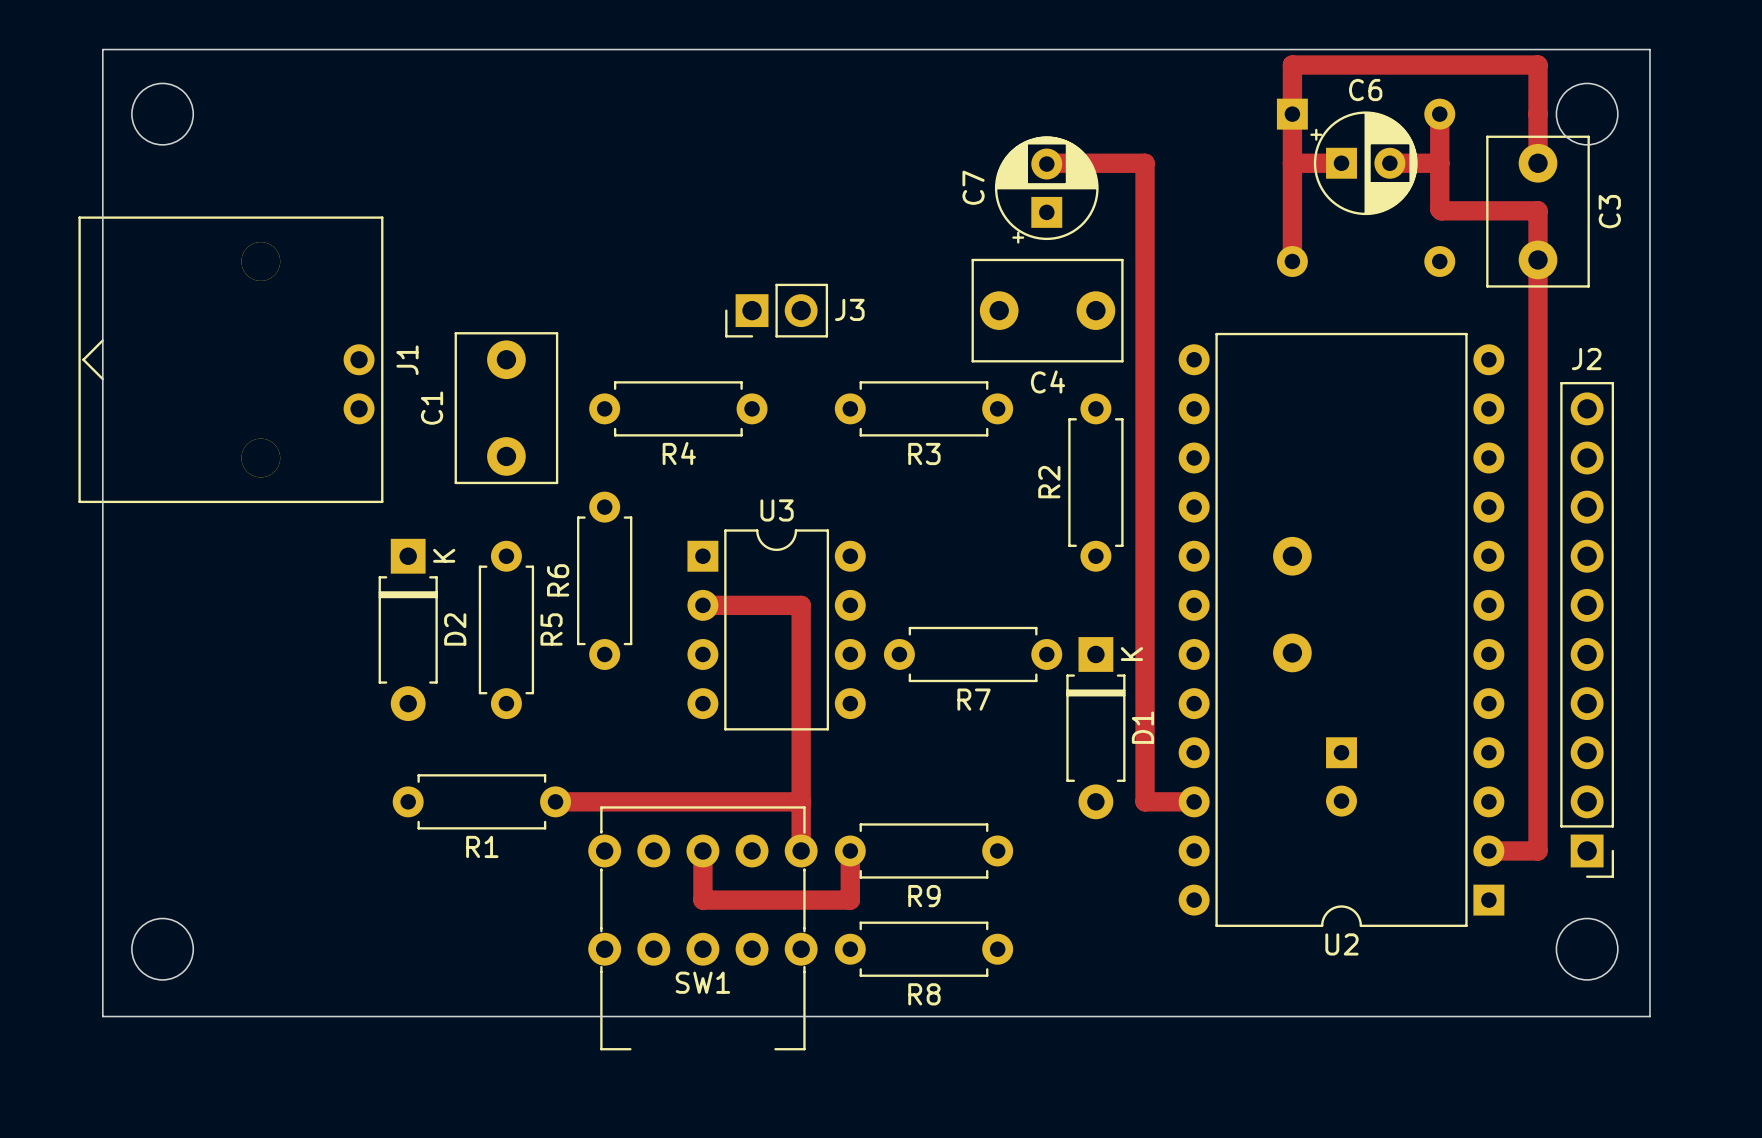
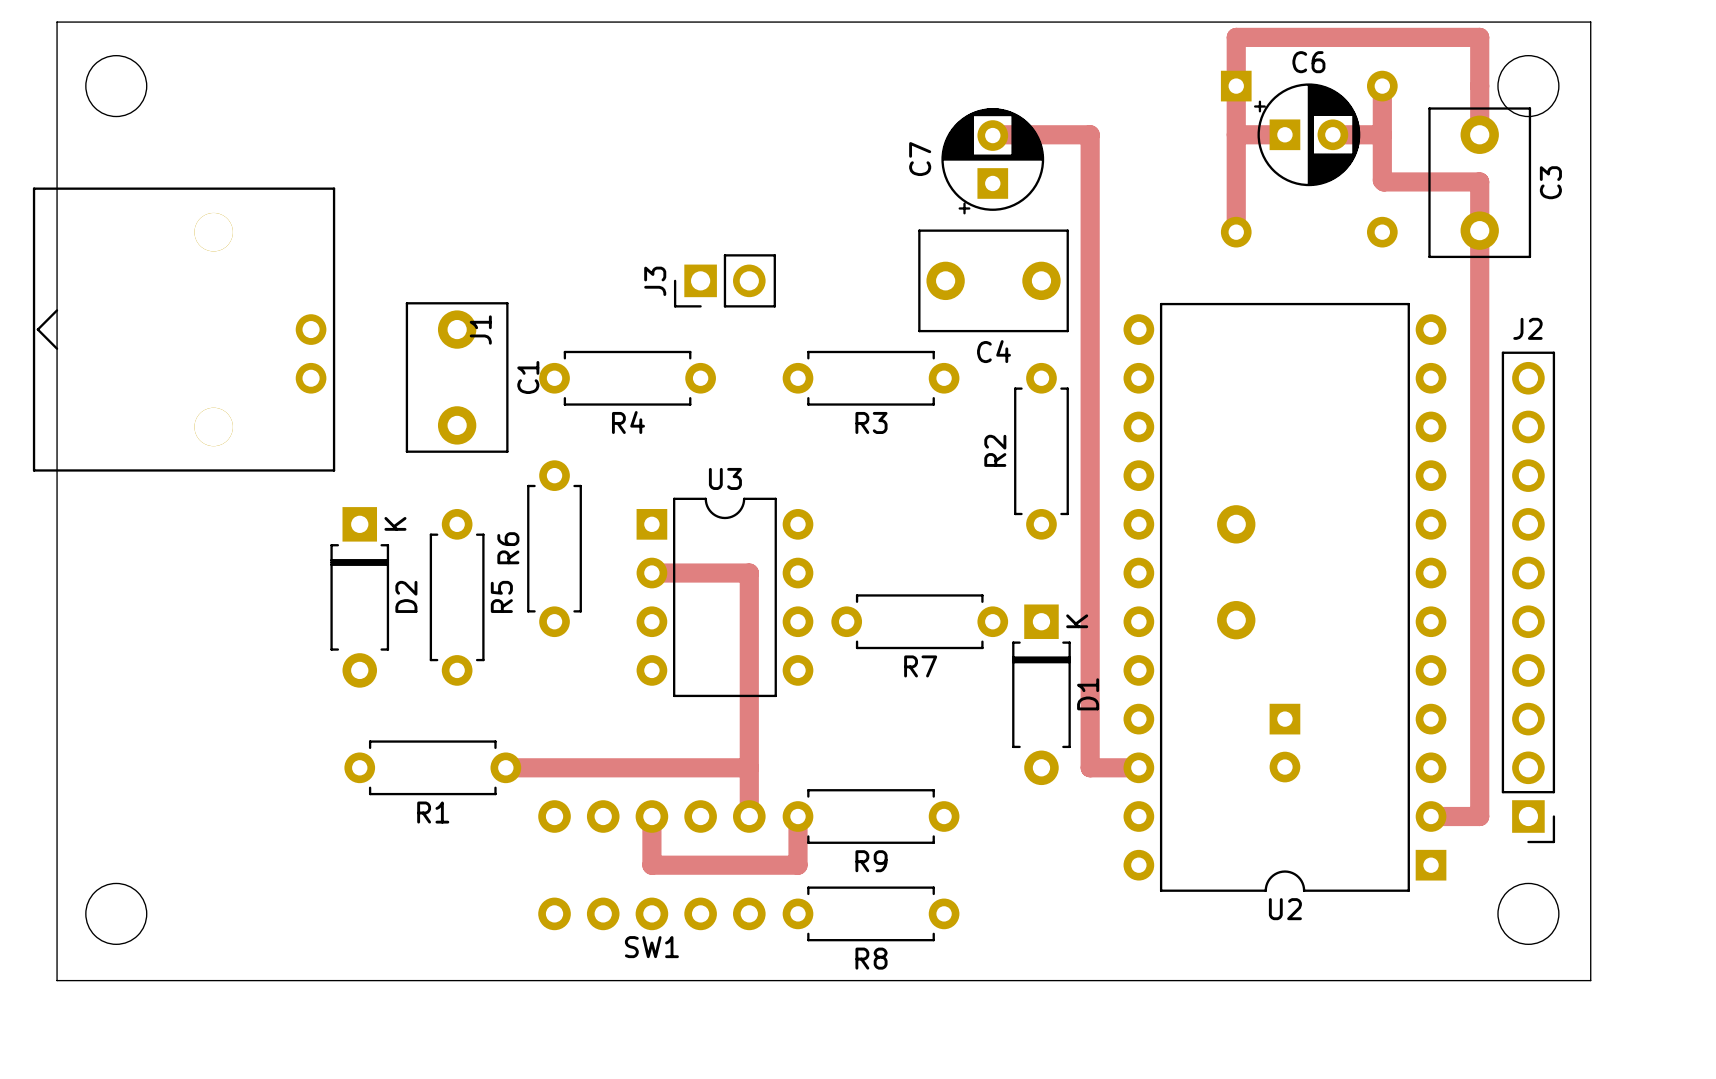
J3 name rotation: 0° (849, 309) -> 90° counterclockwise (655, 281)
J3 name position: J3 (849, 309) -> J3 (655, 281)
J1 name position: J1 (407, 360) -> J1 (480, 330)
C1 name position: C1 (432, 408) -> C1 (528, 377)
SW1 footprint: [588, 806, 818, 1051] -> [538, 800, 766, 931]

